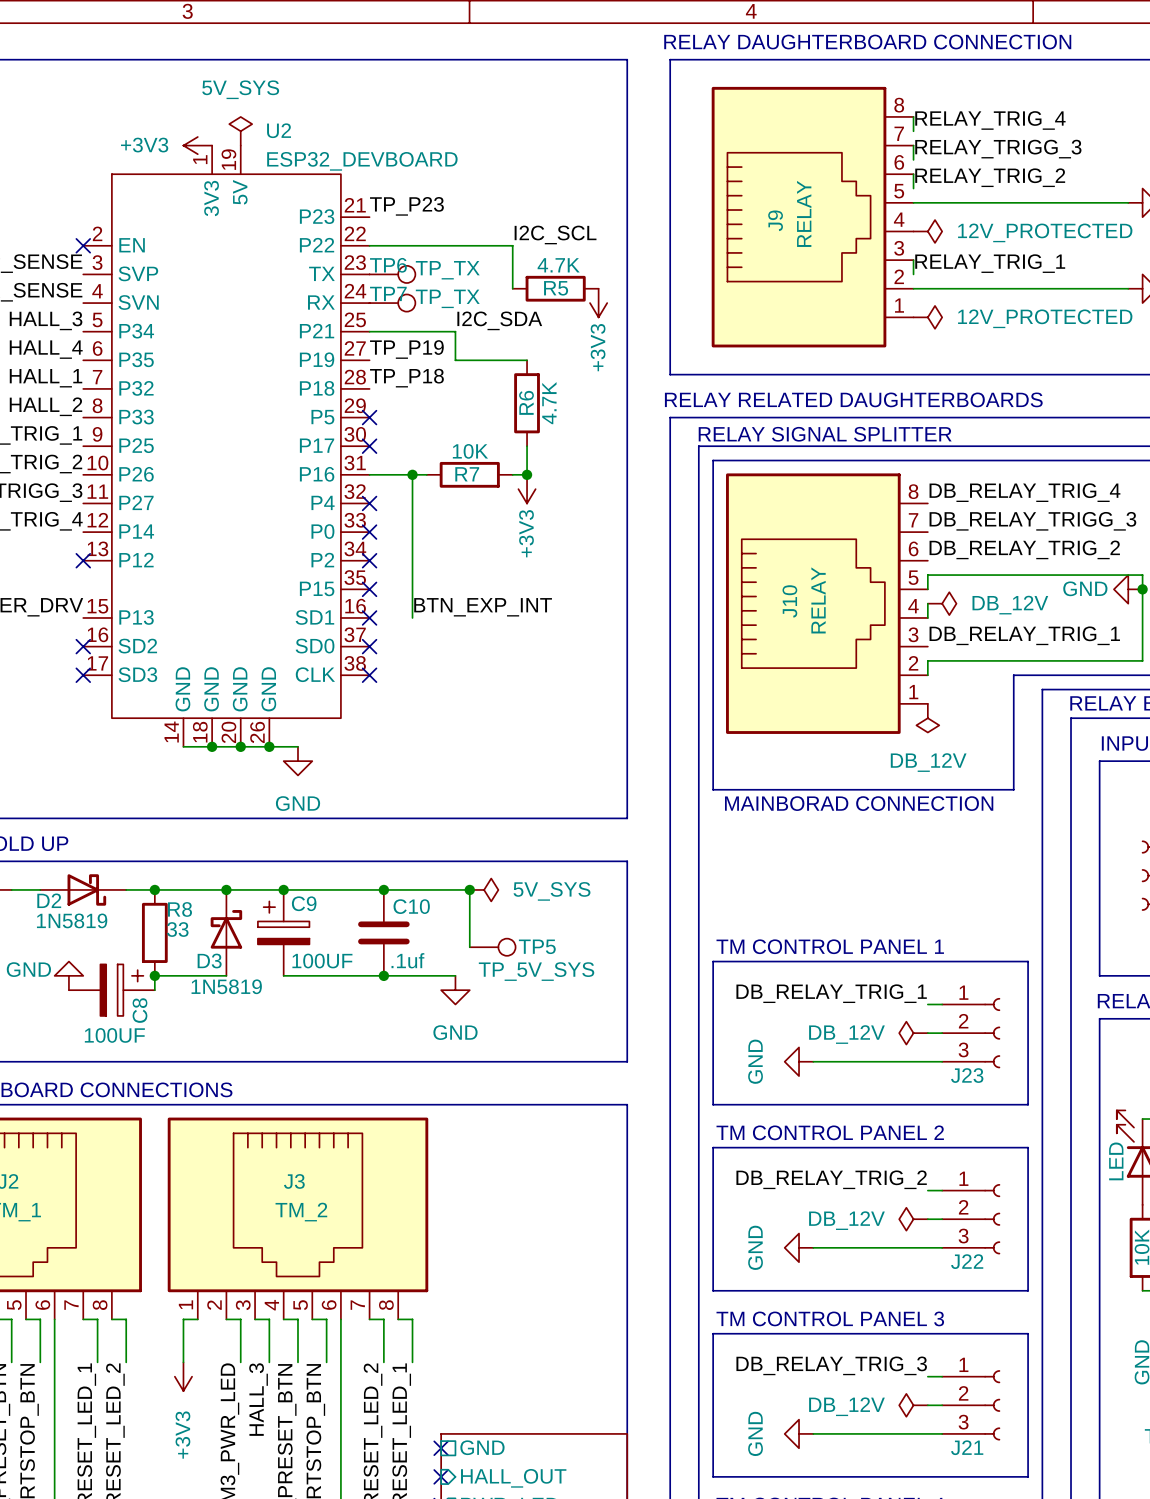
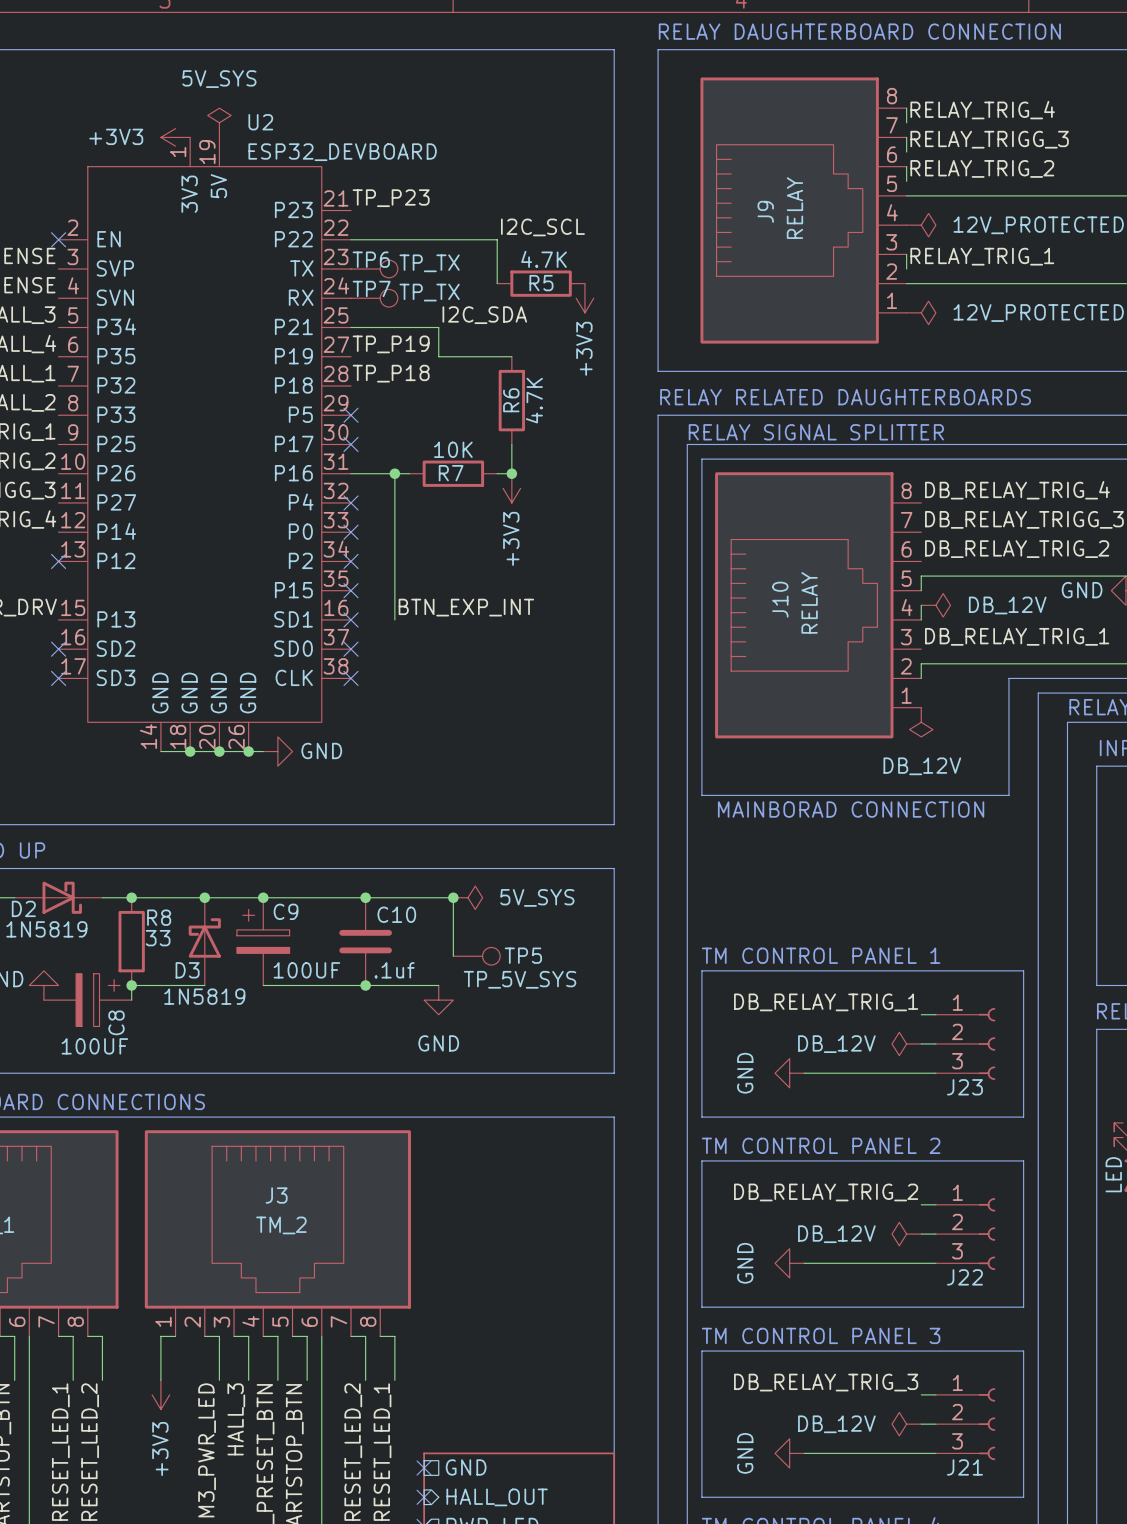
power symbol rotation: 0° (297, 761) -> 90° counterclockwise (277, 751)

